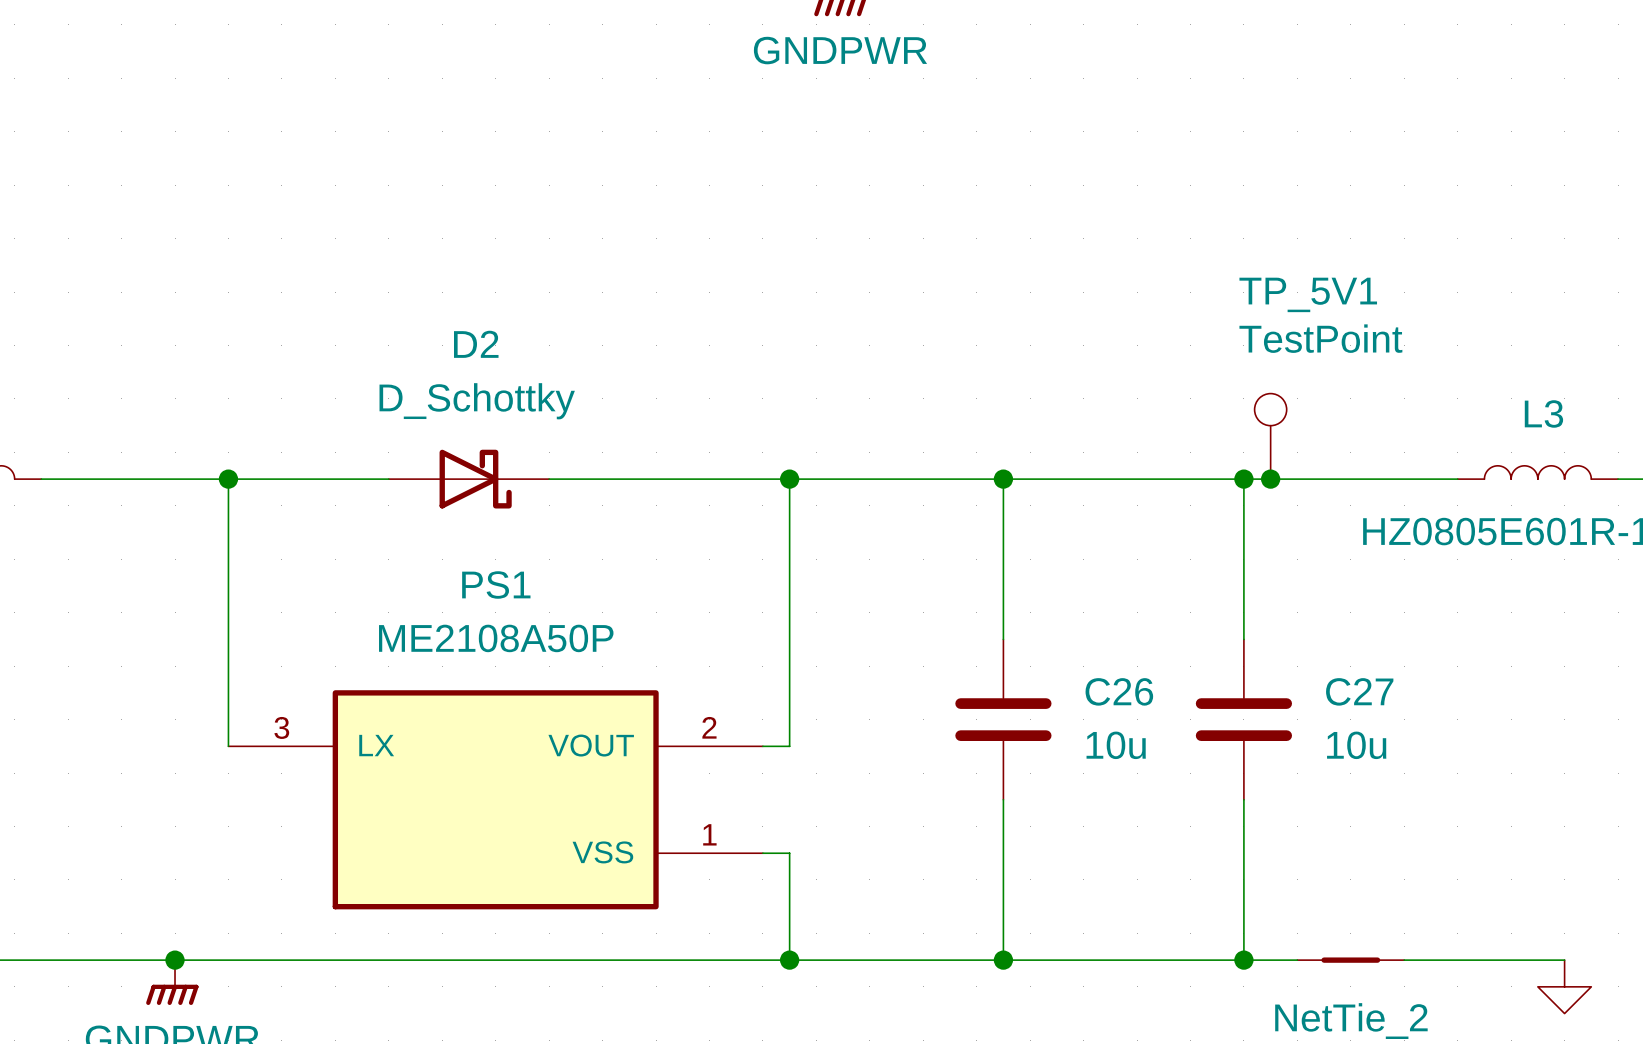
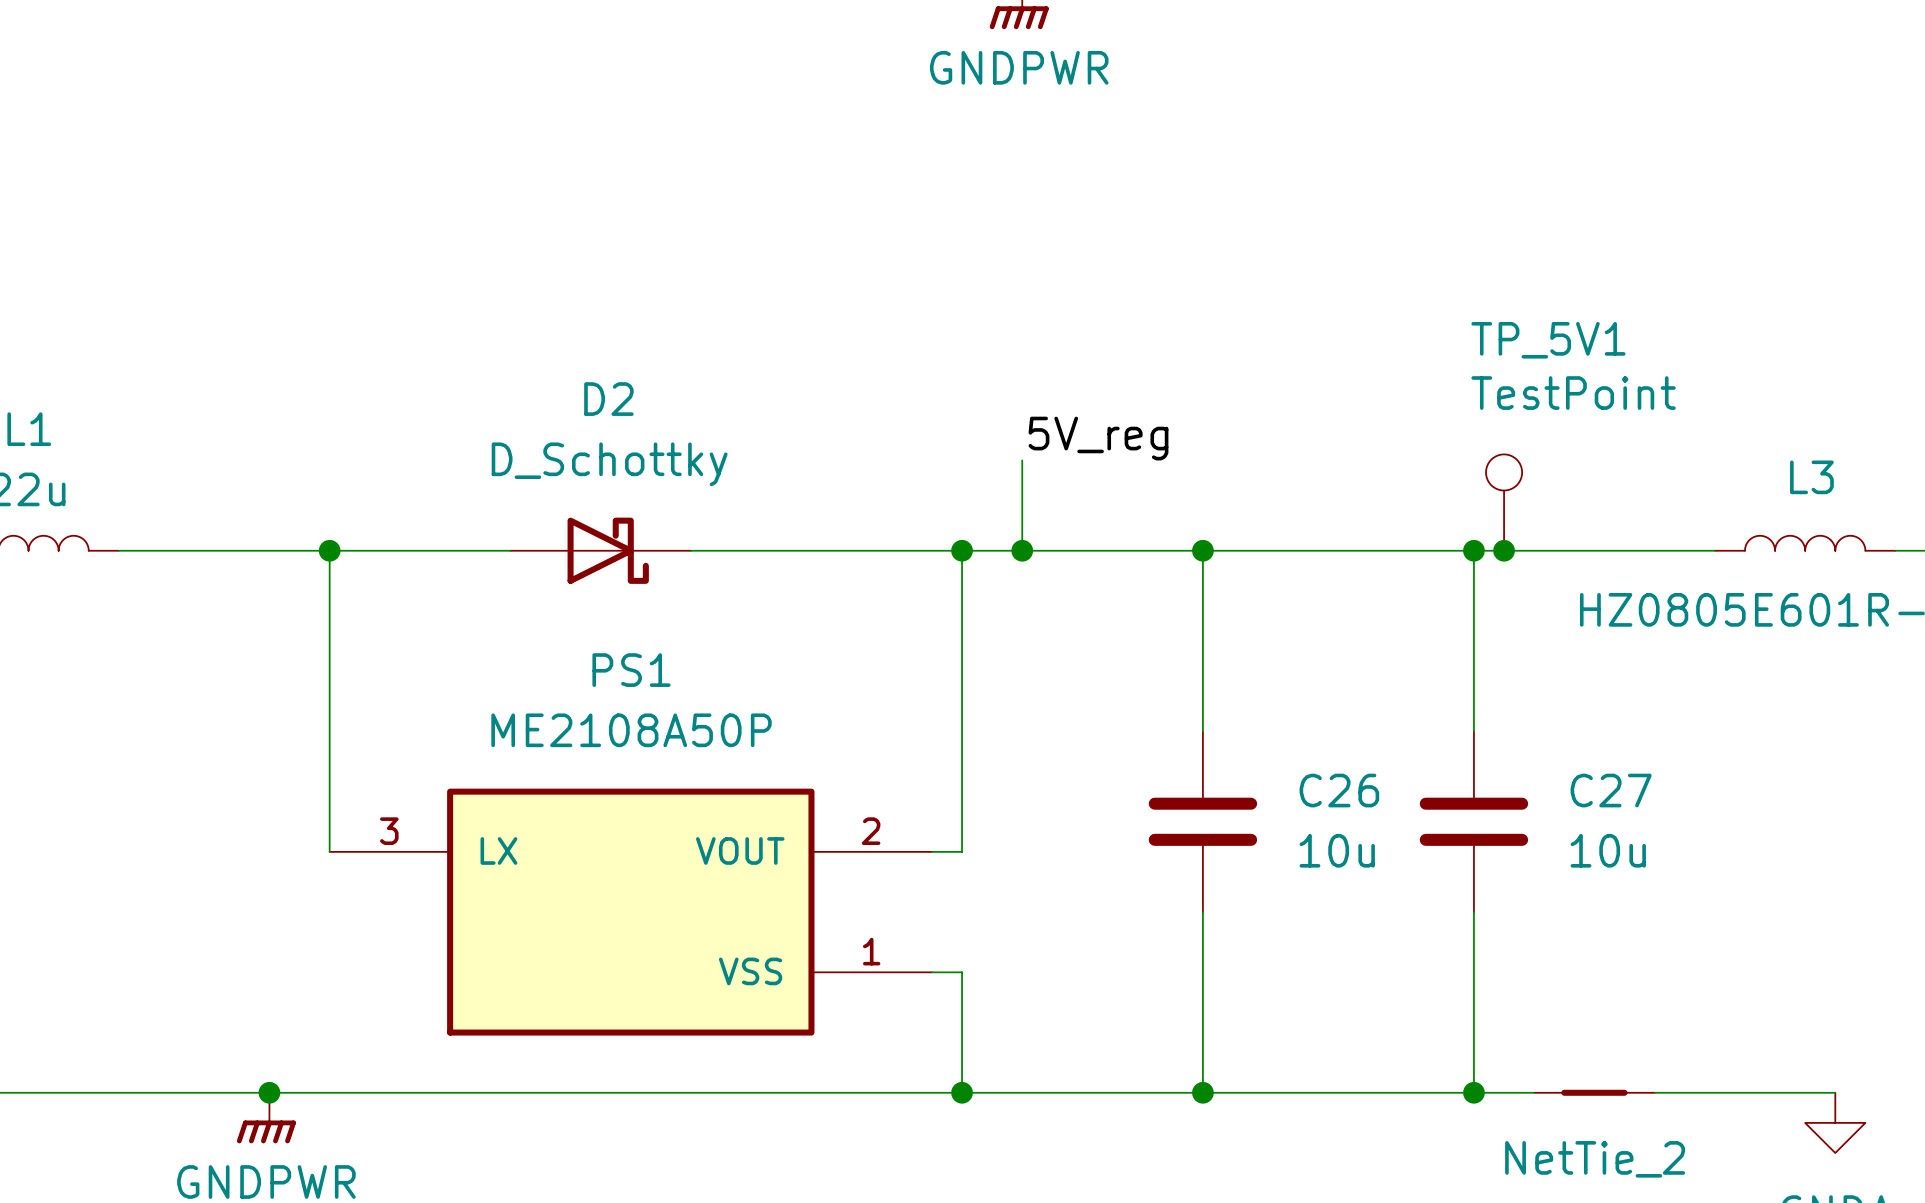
label: none -> 5V_reg (1098, 438)
wire: none -> (1022, 460) (1022, 550)
junction: none -> (1022, 550)

